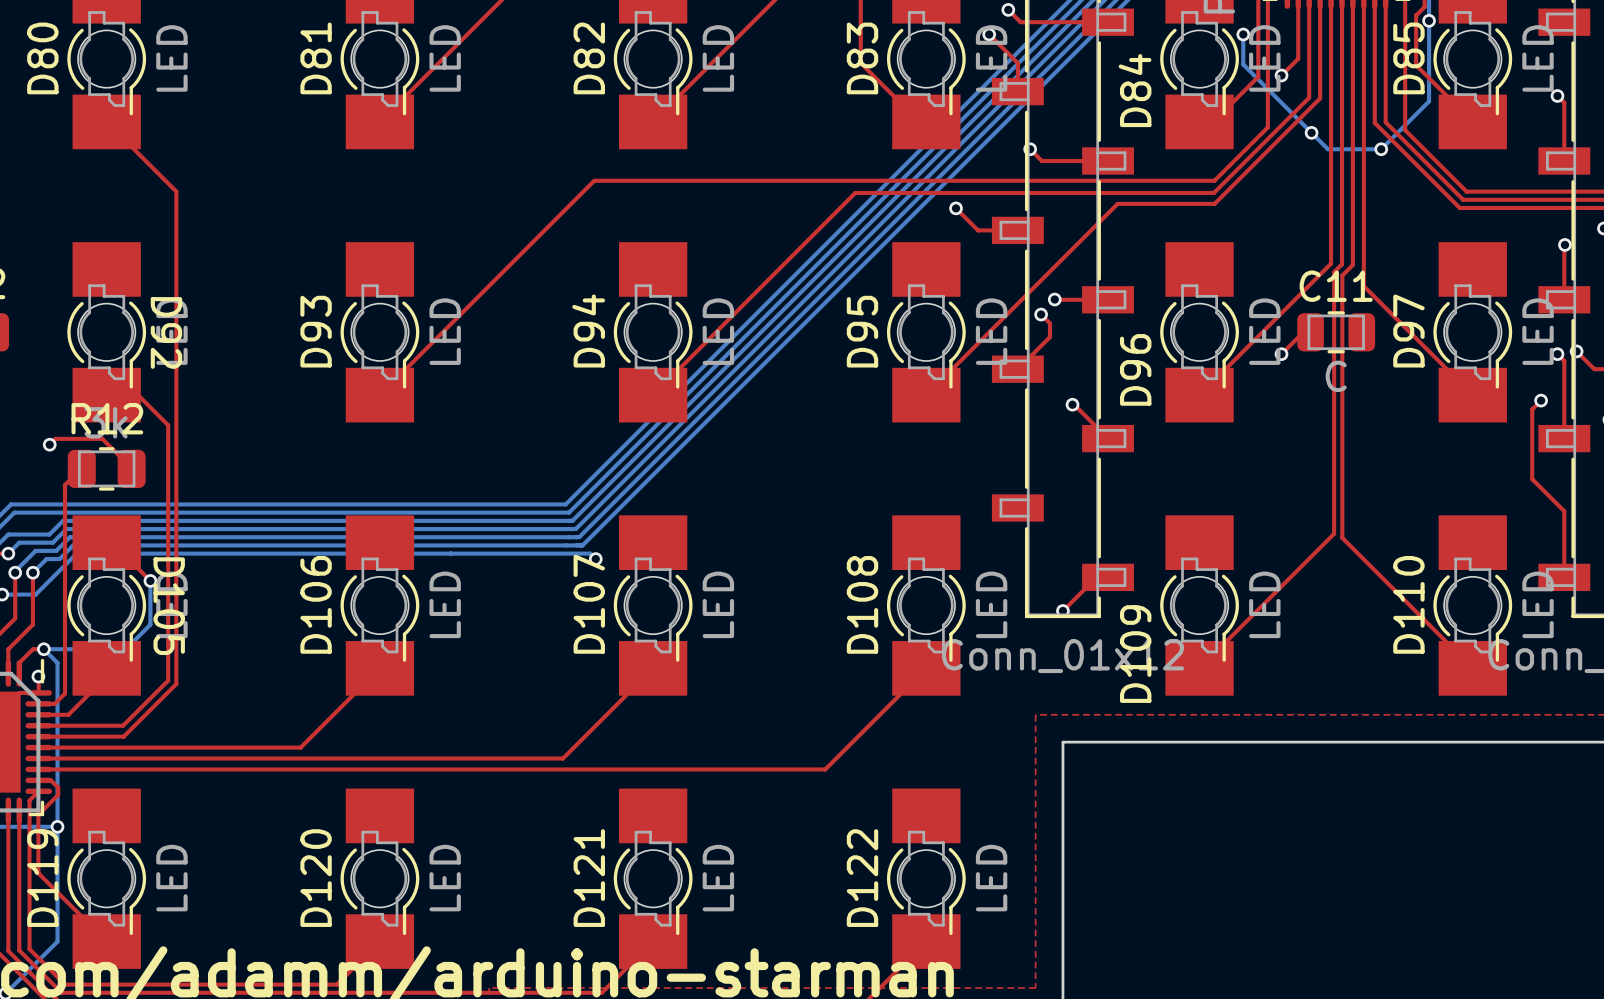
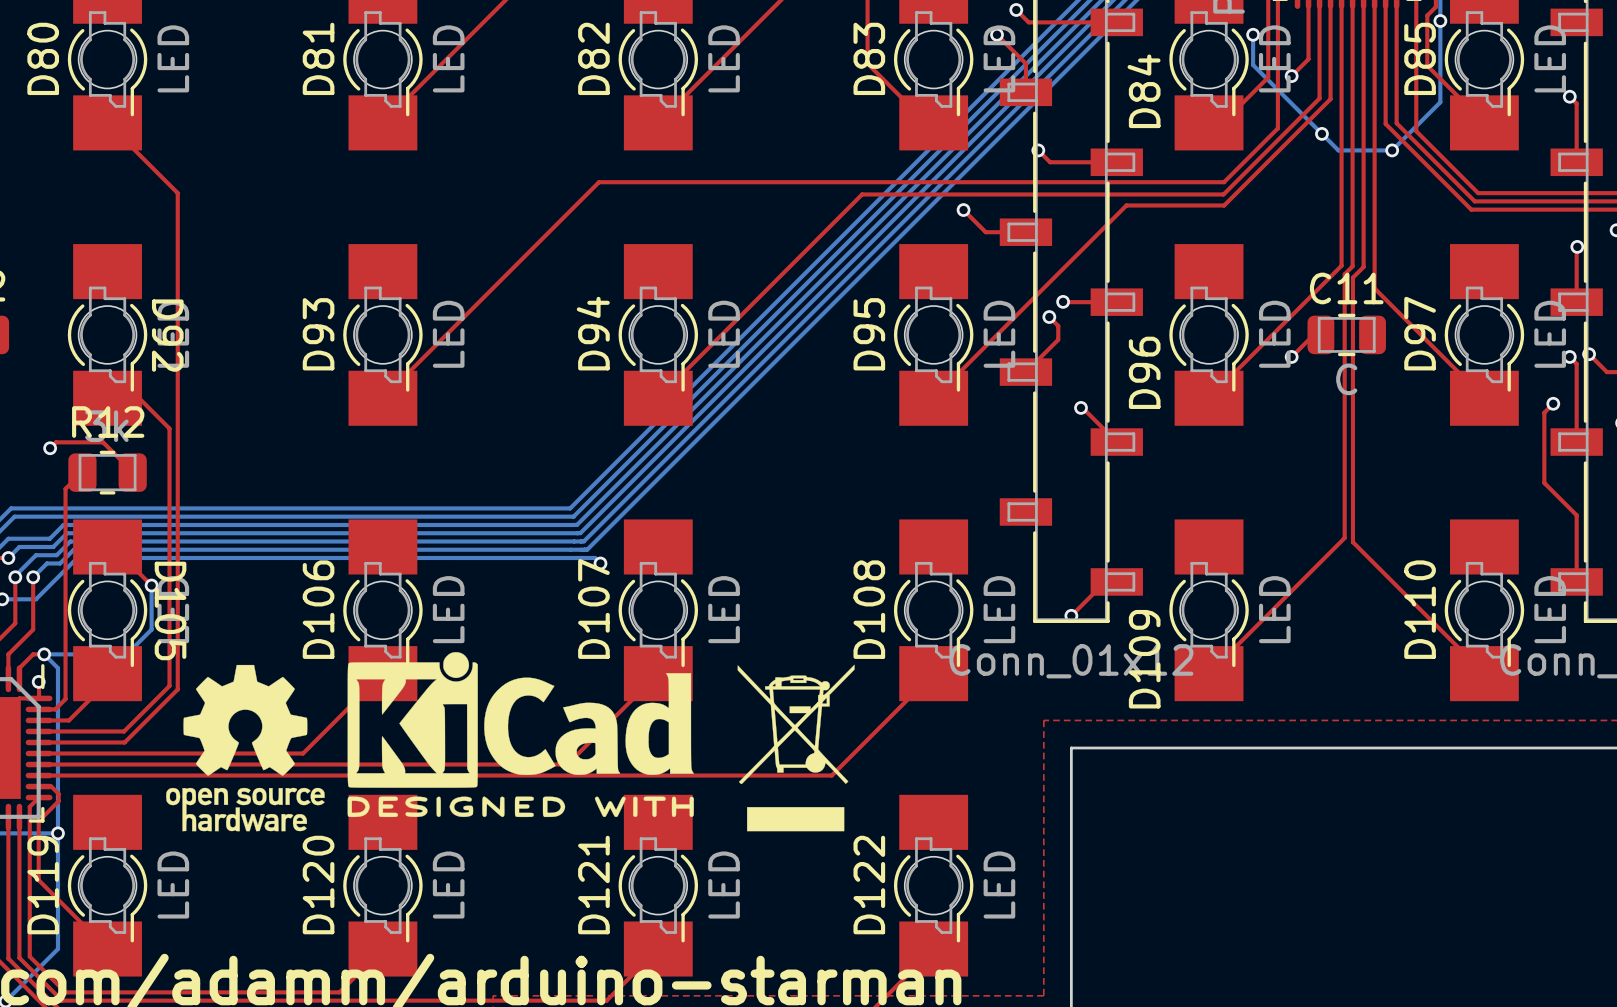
drawing: none -> [166, 652, 694, 832]
drawing: none -> [737, 664, 855, 832]

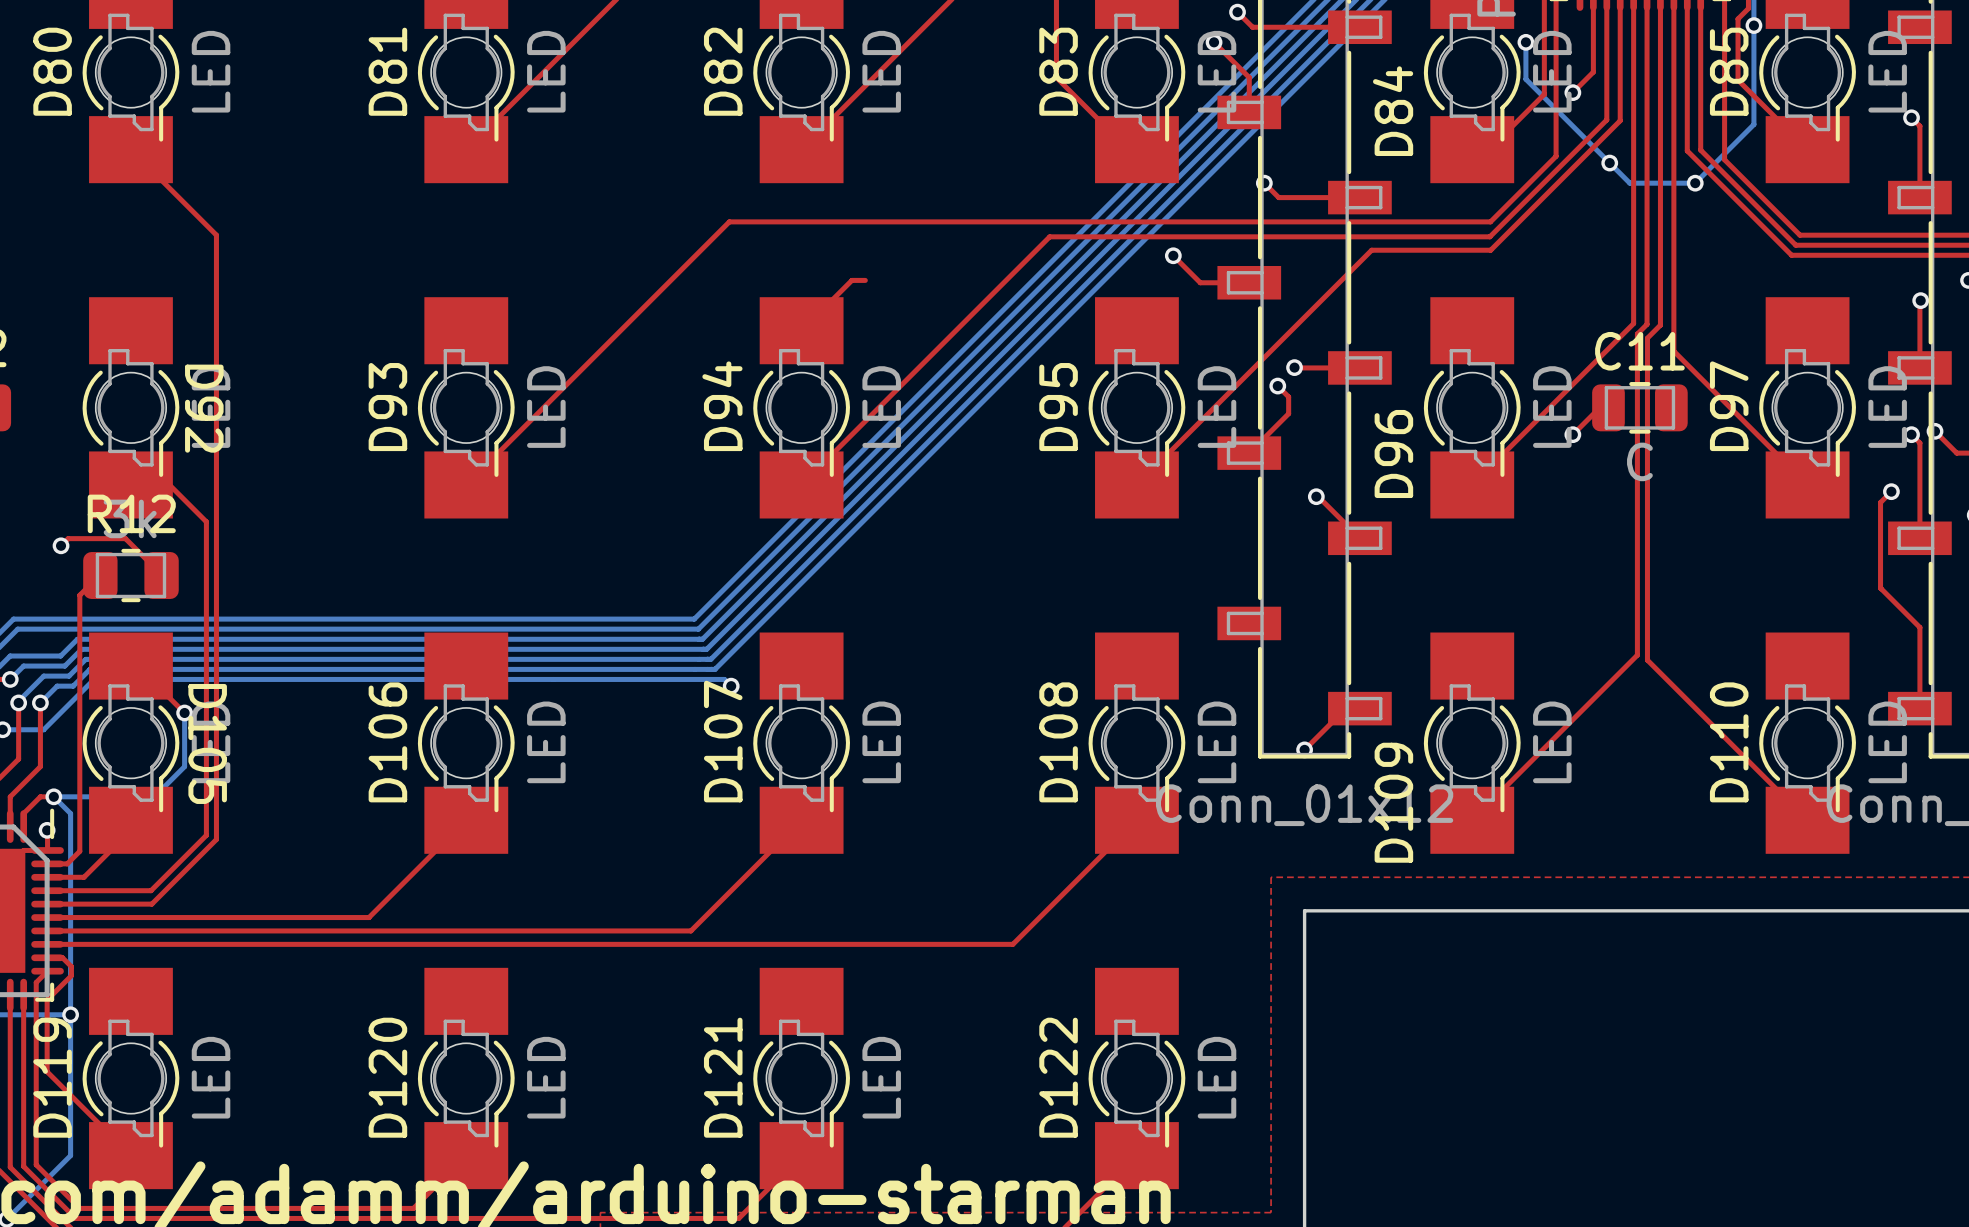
top track: none -> (865, 280) (851, 280) (801, 330)
drawing: [166, 652, 694, 832] -> none
drawing: [737, 664, 855, 832] -> none

